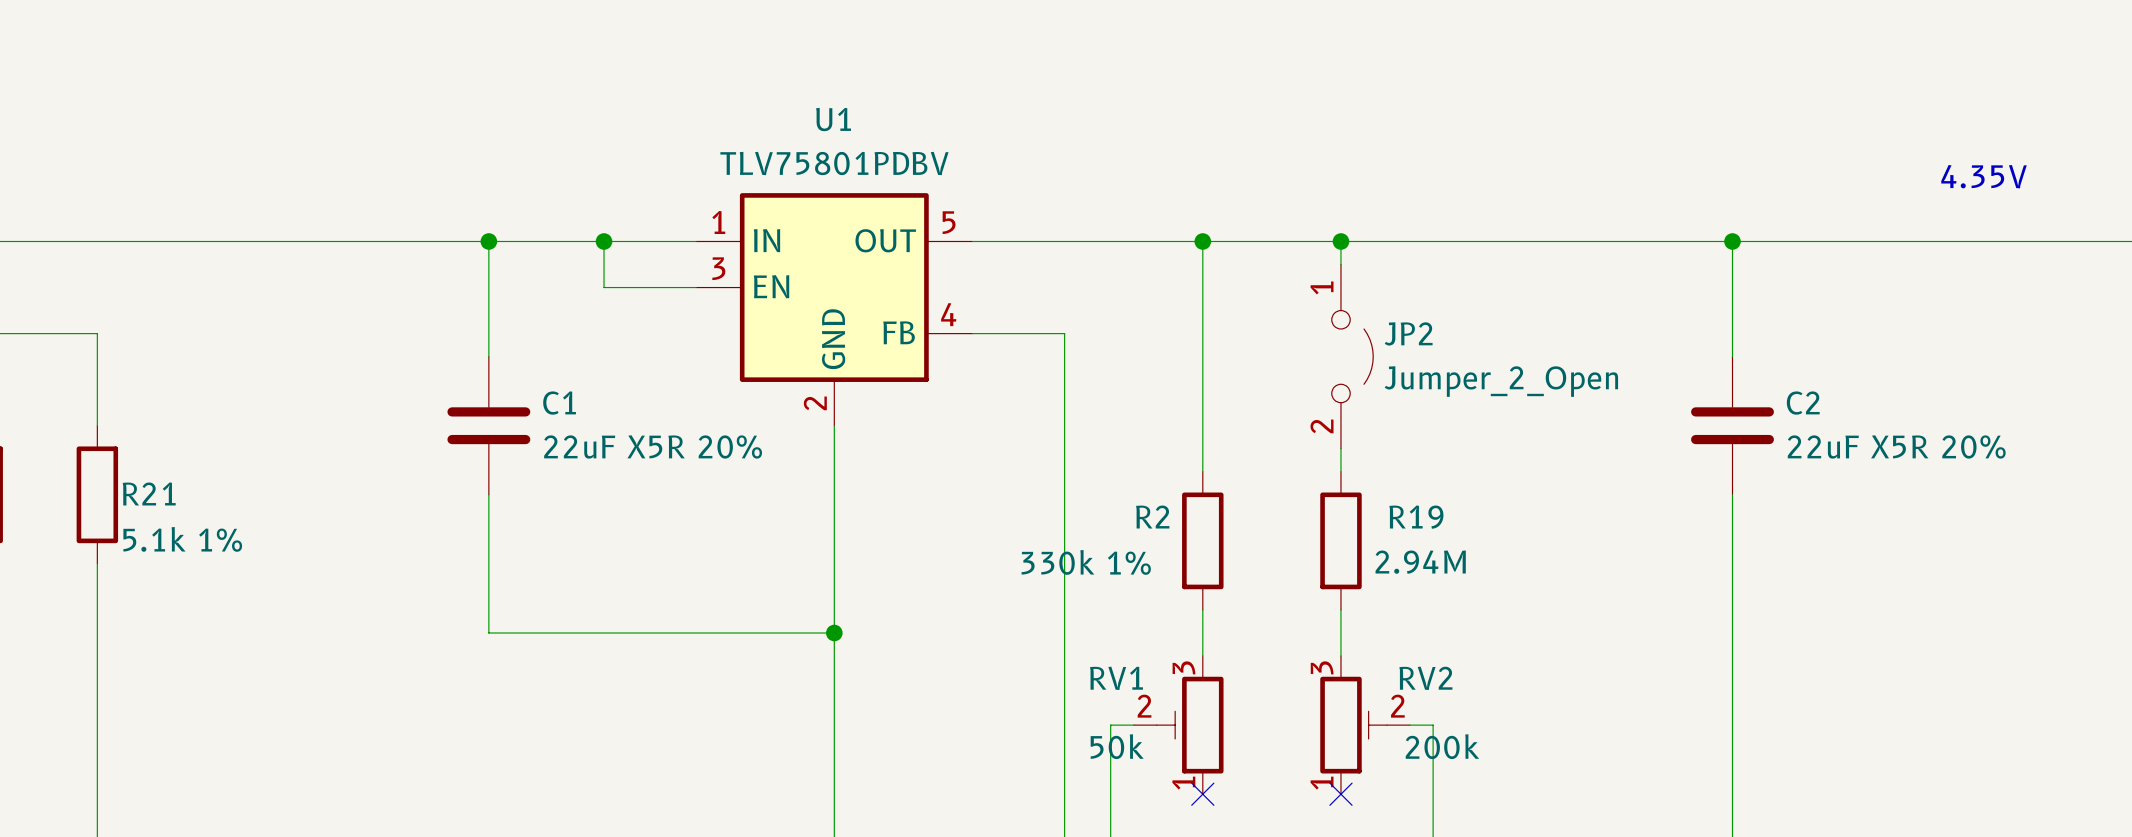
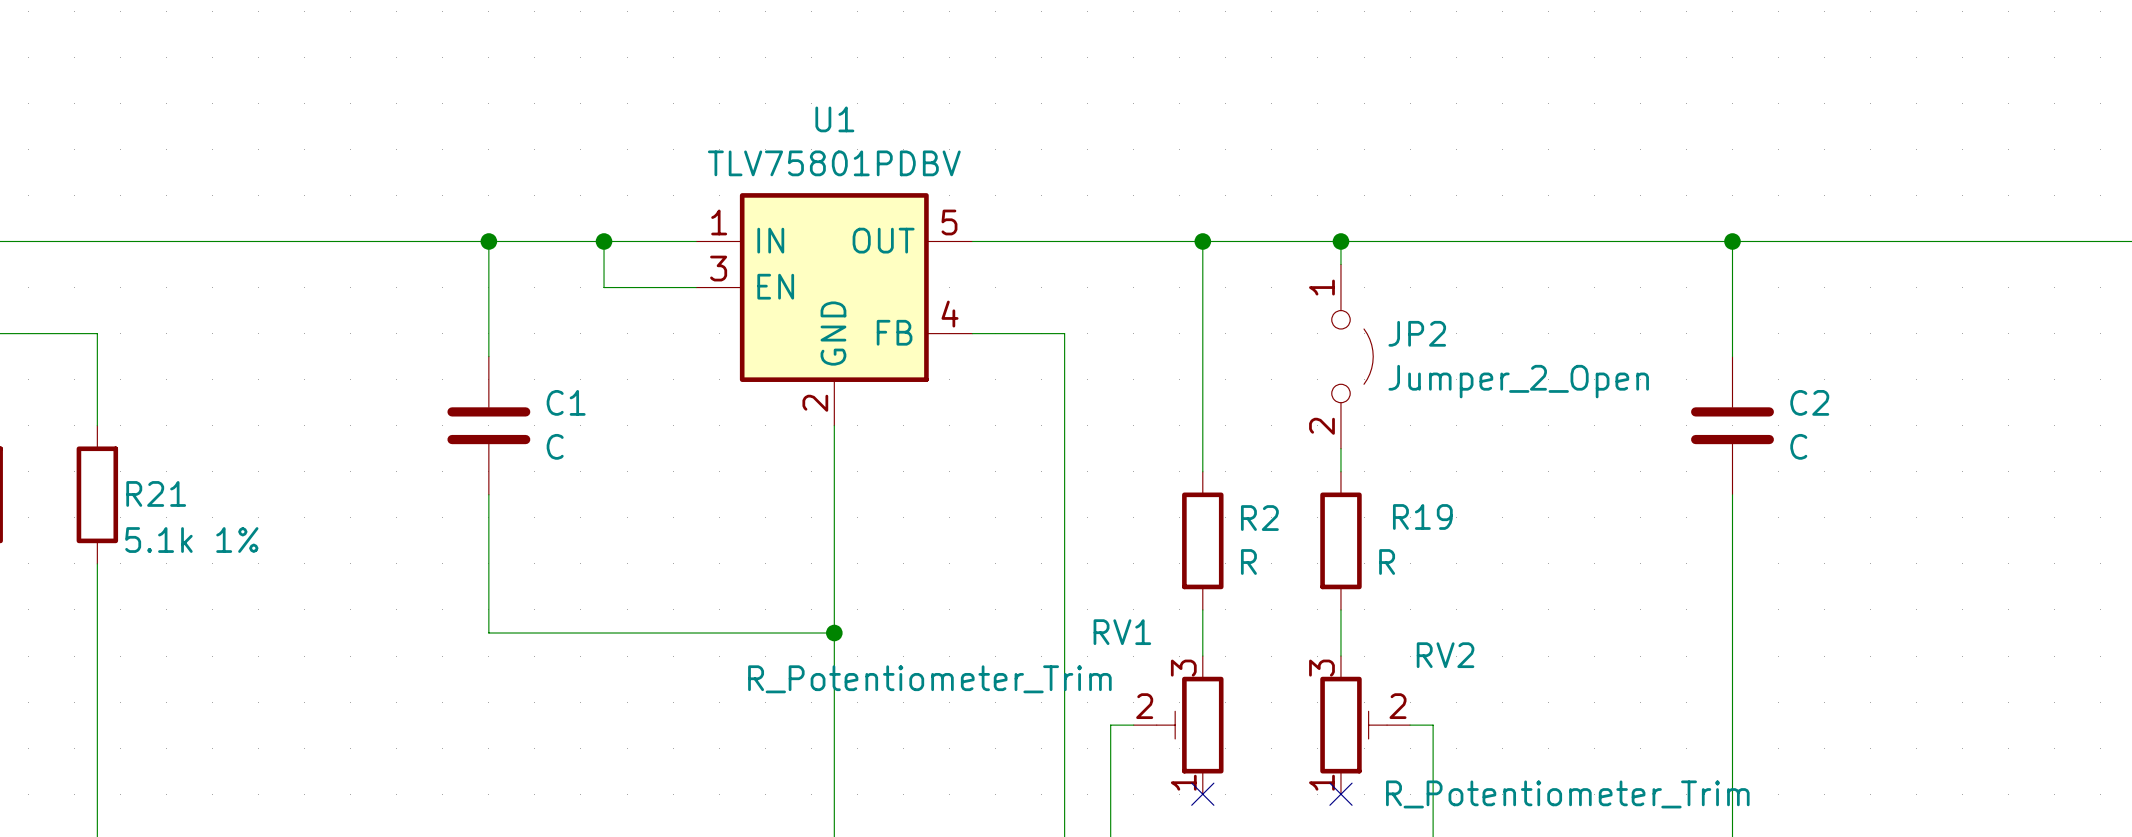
text: 4.35V (1984, 176) -> none
C1 value: 22uF X5R 20% (653, 446) -> C (555, 446)
C2 value: 22uF X5R 20% (1896, 446) -> C (1798, 446)
R2 name position: R2 (1152, 517) -> R2 (1259, 518)
R2 value: 330k 1% (1086, 562) -> R (1248, 562)
R19 value: 2.94M (1420, 562) -> R (1387, 562)
RV1 name position: RV1 (1116, 678) -> RV1 (1122, 632)
RV2 name position: RV2 (1425, 678) -> RV2 (1445, 655)
RV1 value: 50k (1117, 746) -> R_Potentiometer_Trim (929, 679)
RV2 value: 200k (1442, 746) -> R_Potentiometer_Trim (1567, 794)

